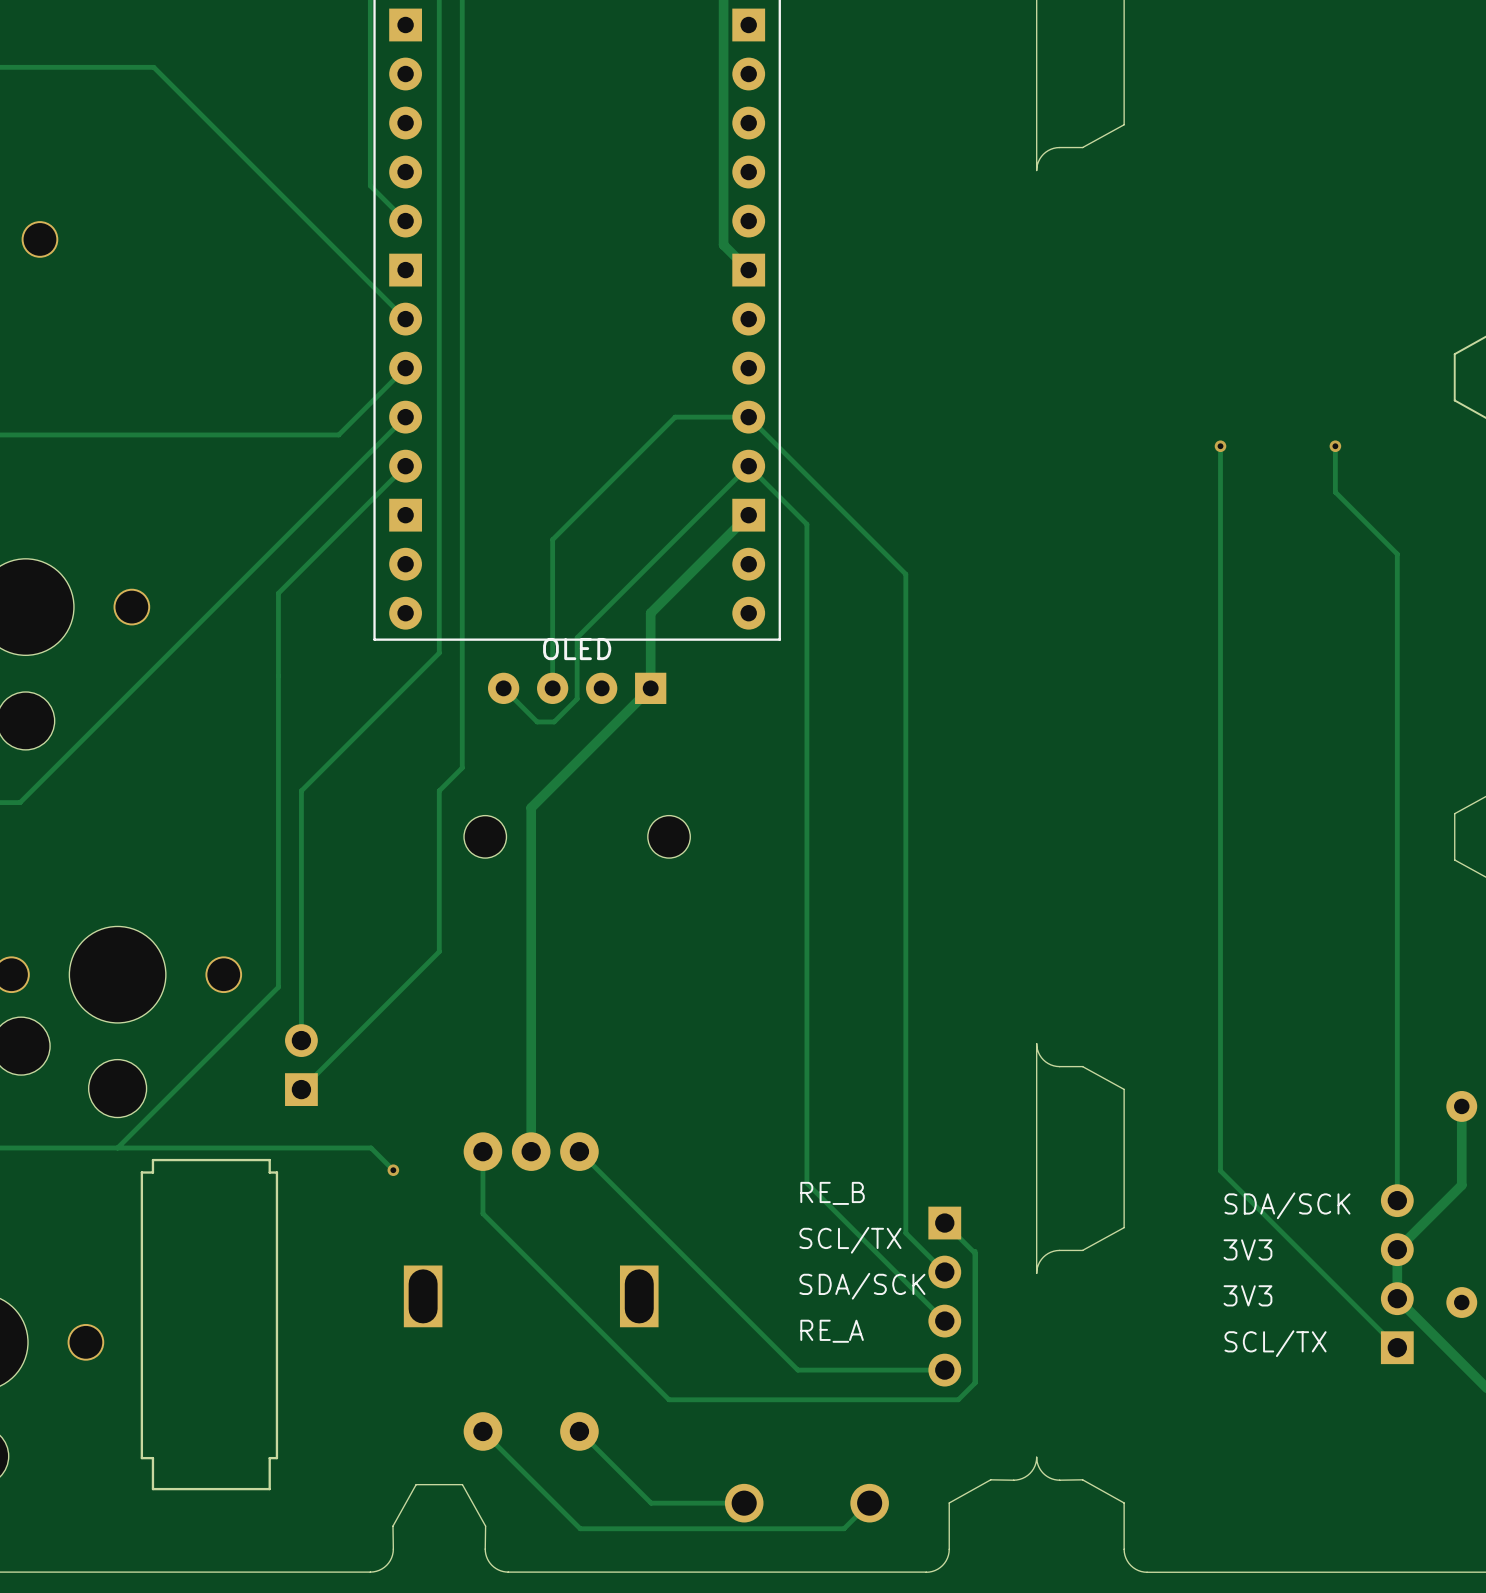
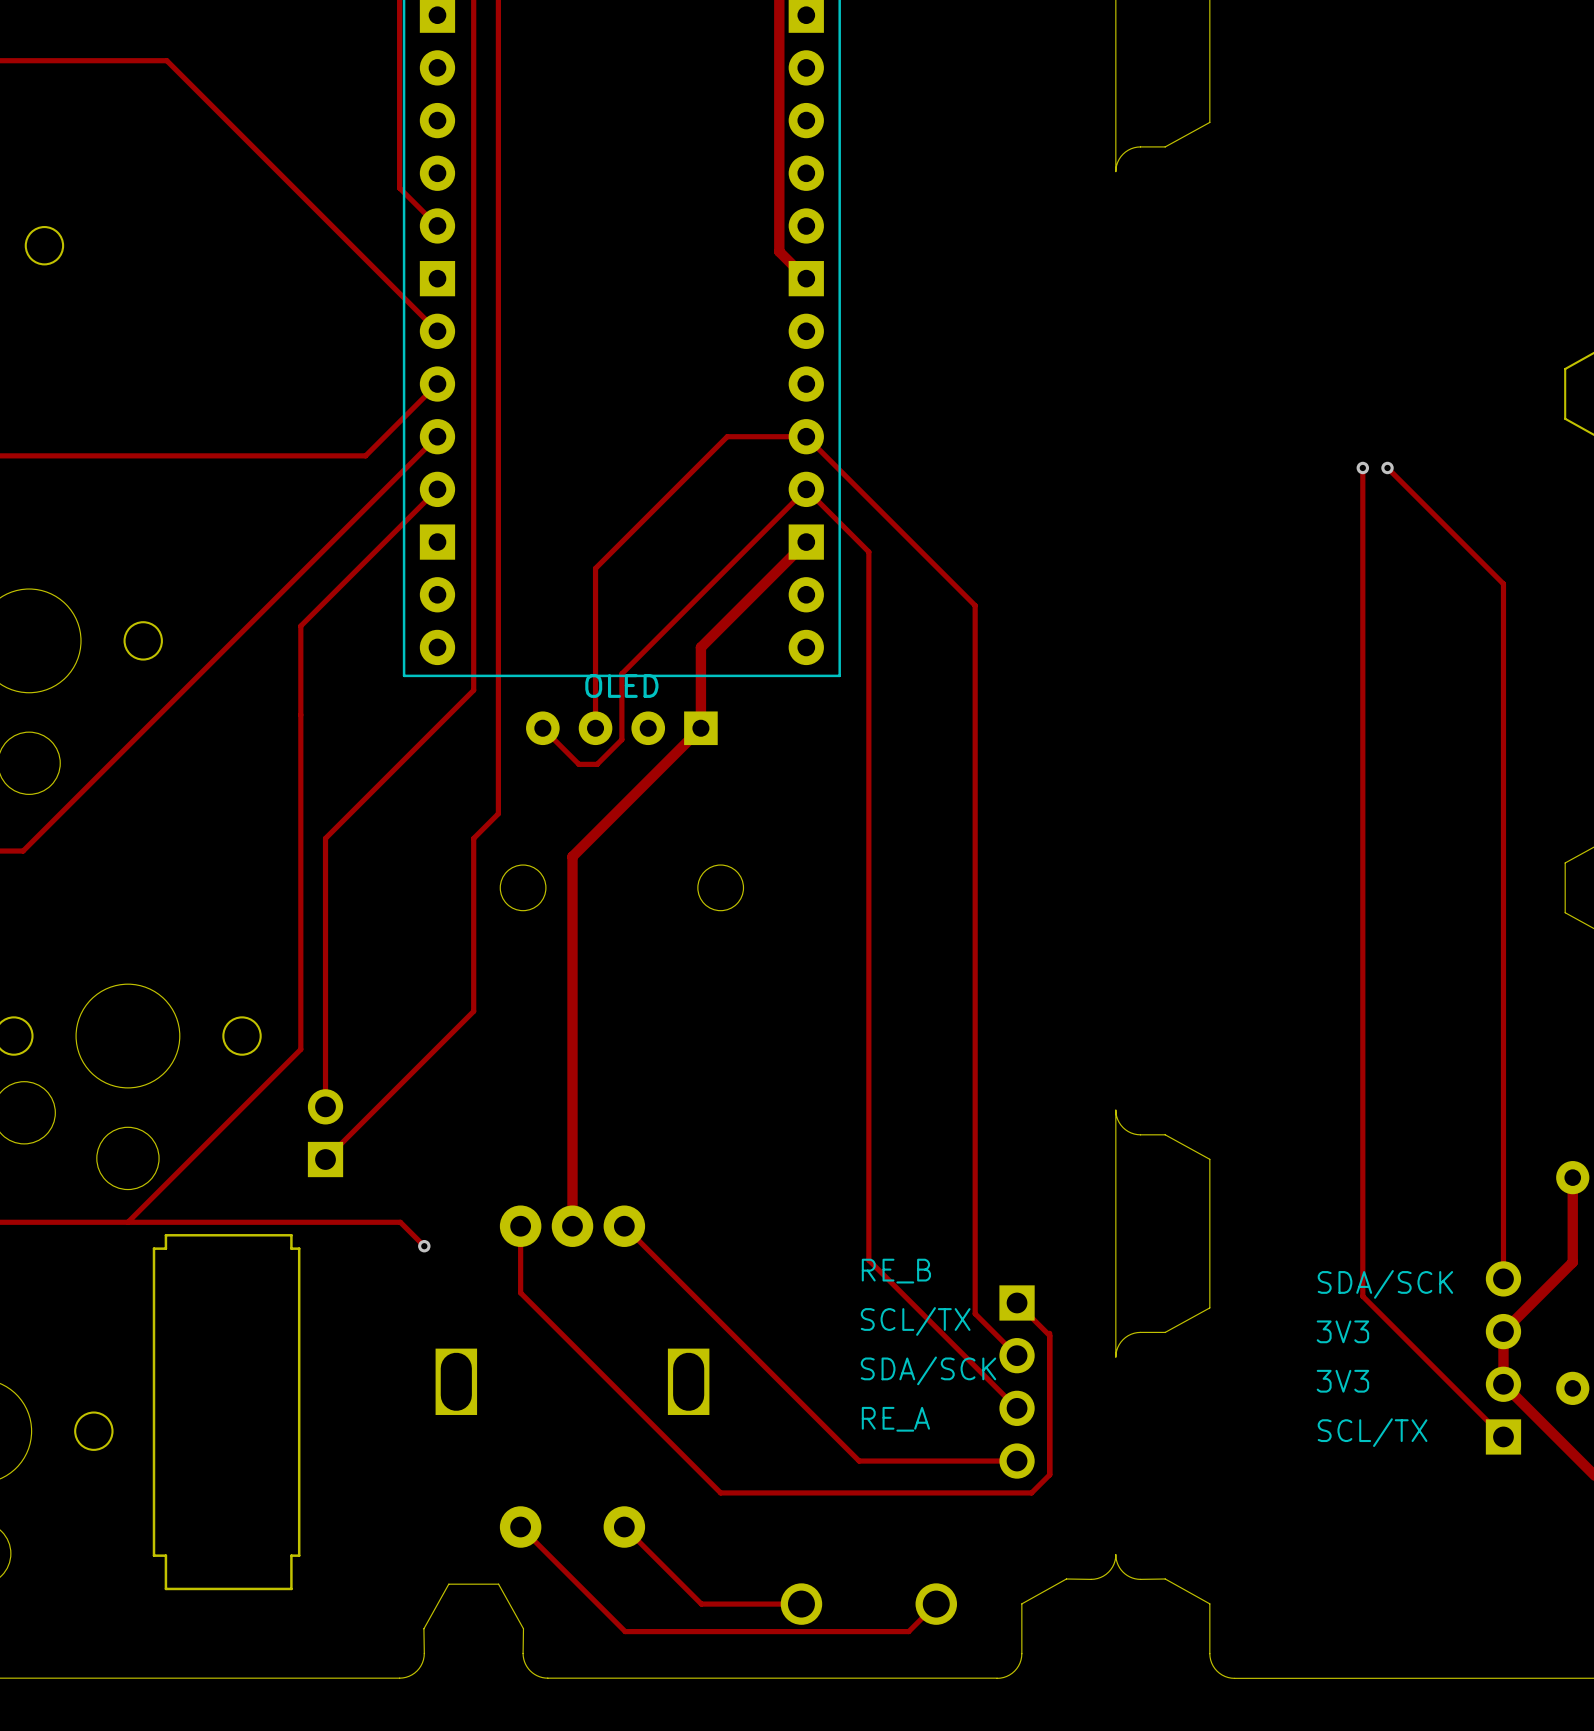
track: (1220, 446) (1220, 1170) (1266, 1216) -> (1362, 467) (1362, 1296)
via: (1220, 446) -> none
via: none -> (1362, 467)
via: none -> (1387, 467)
track: (1335, 446) (1335, 492) -> (1387, 467) (1436, 517)
via: (1335, 446) -> none

